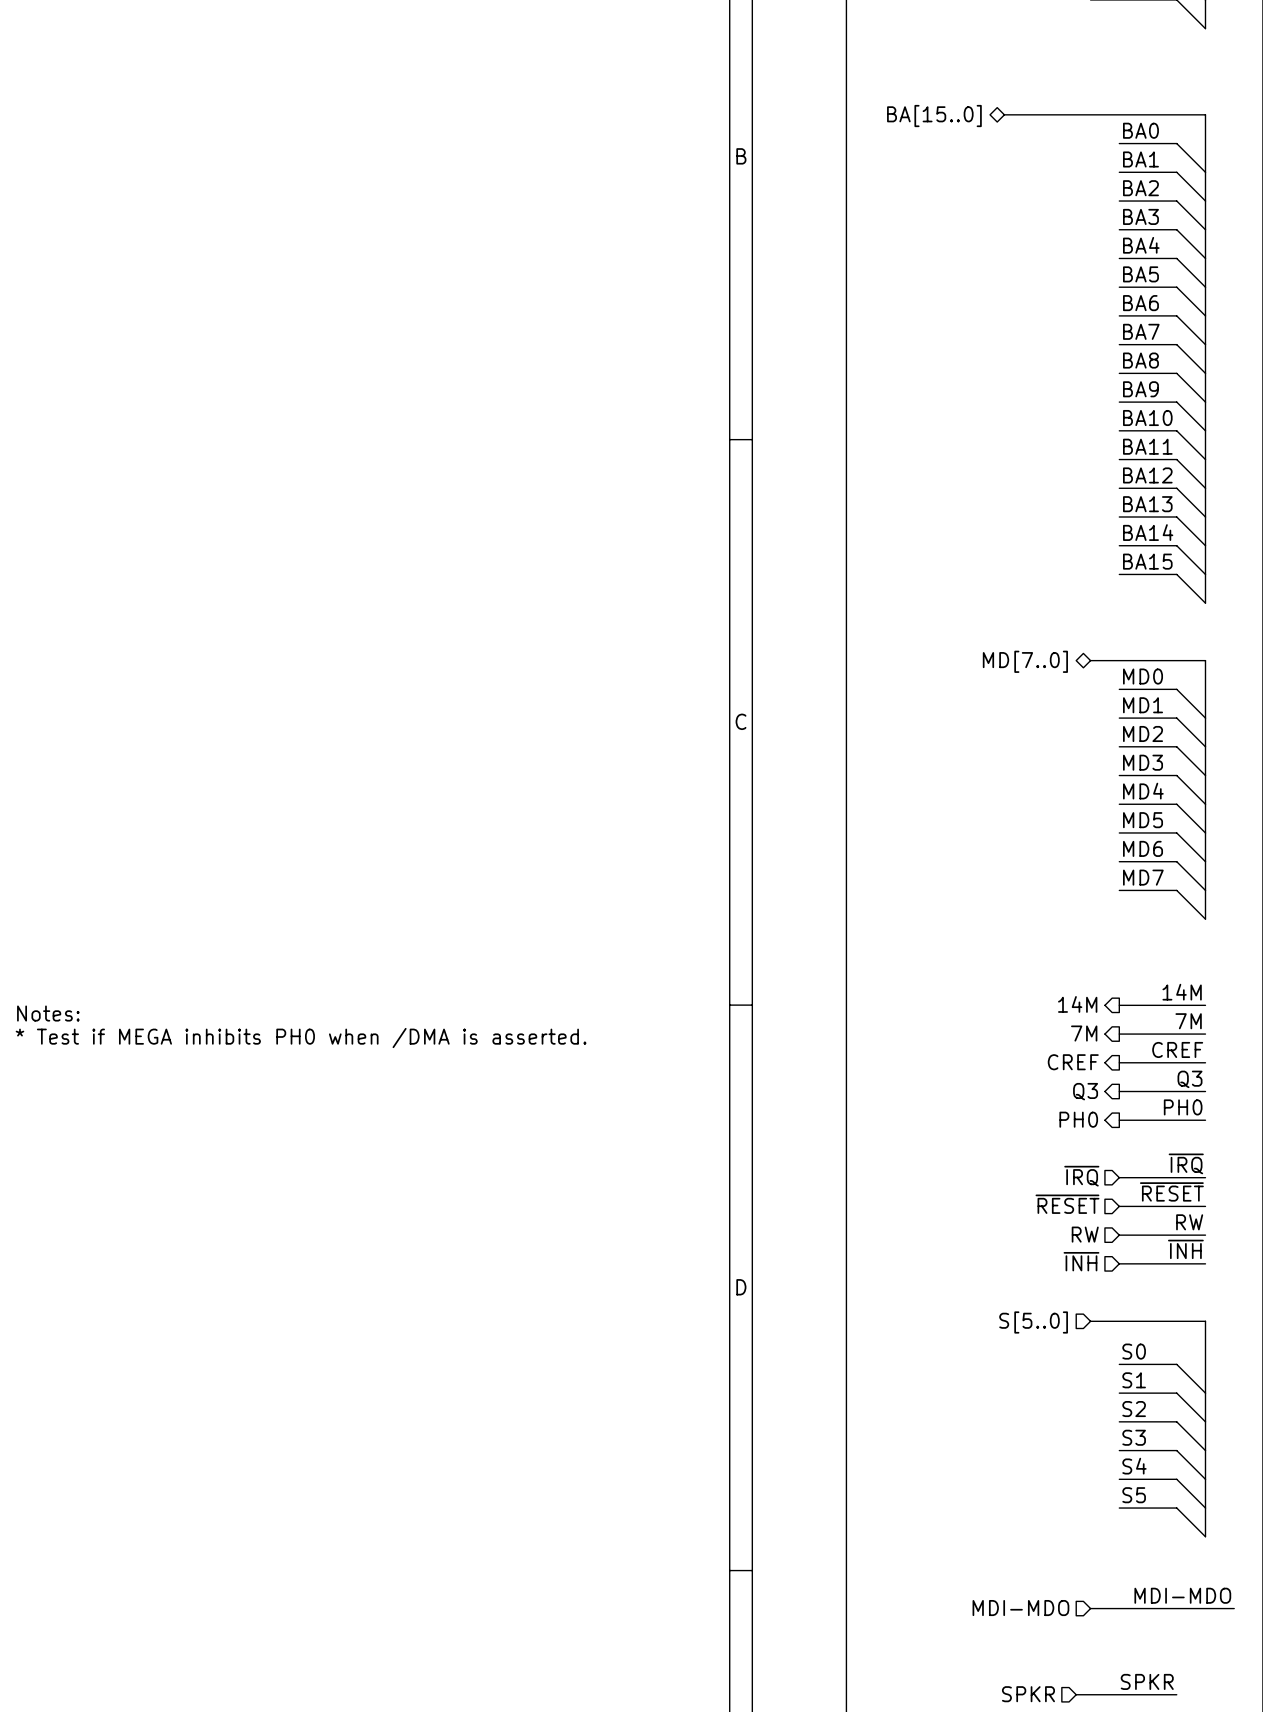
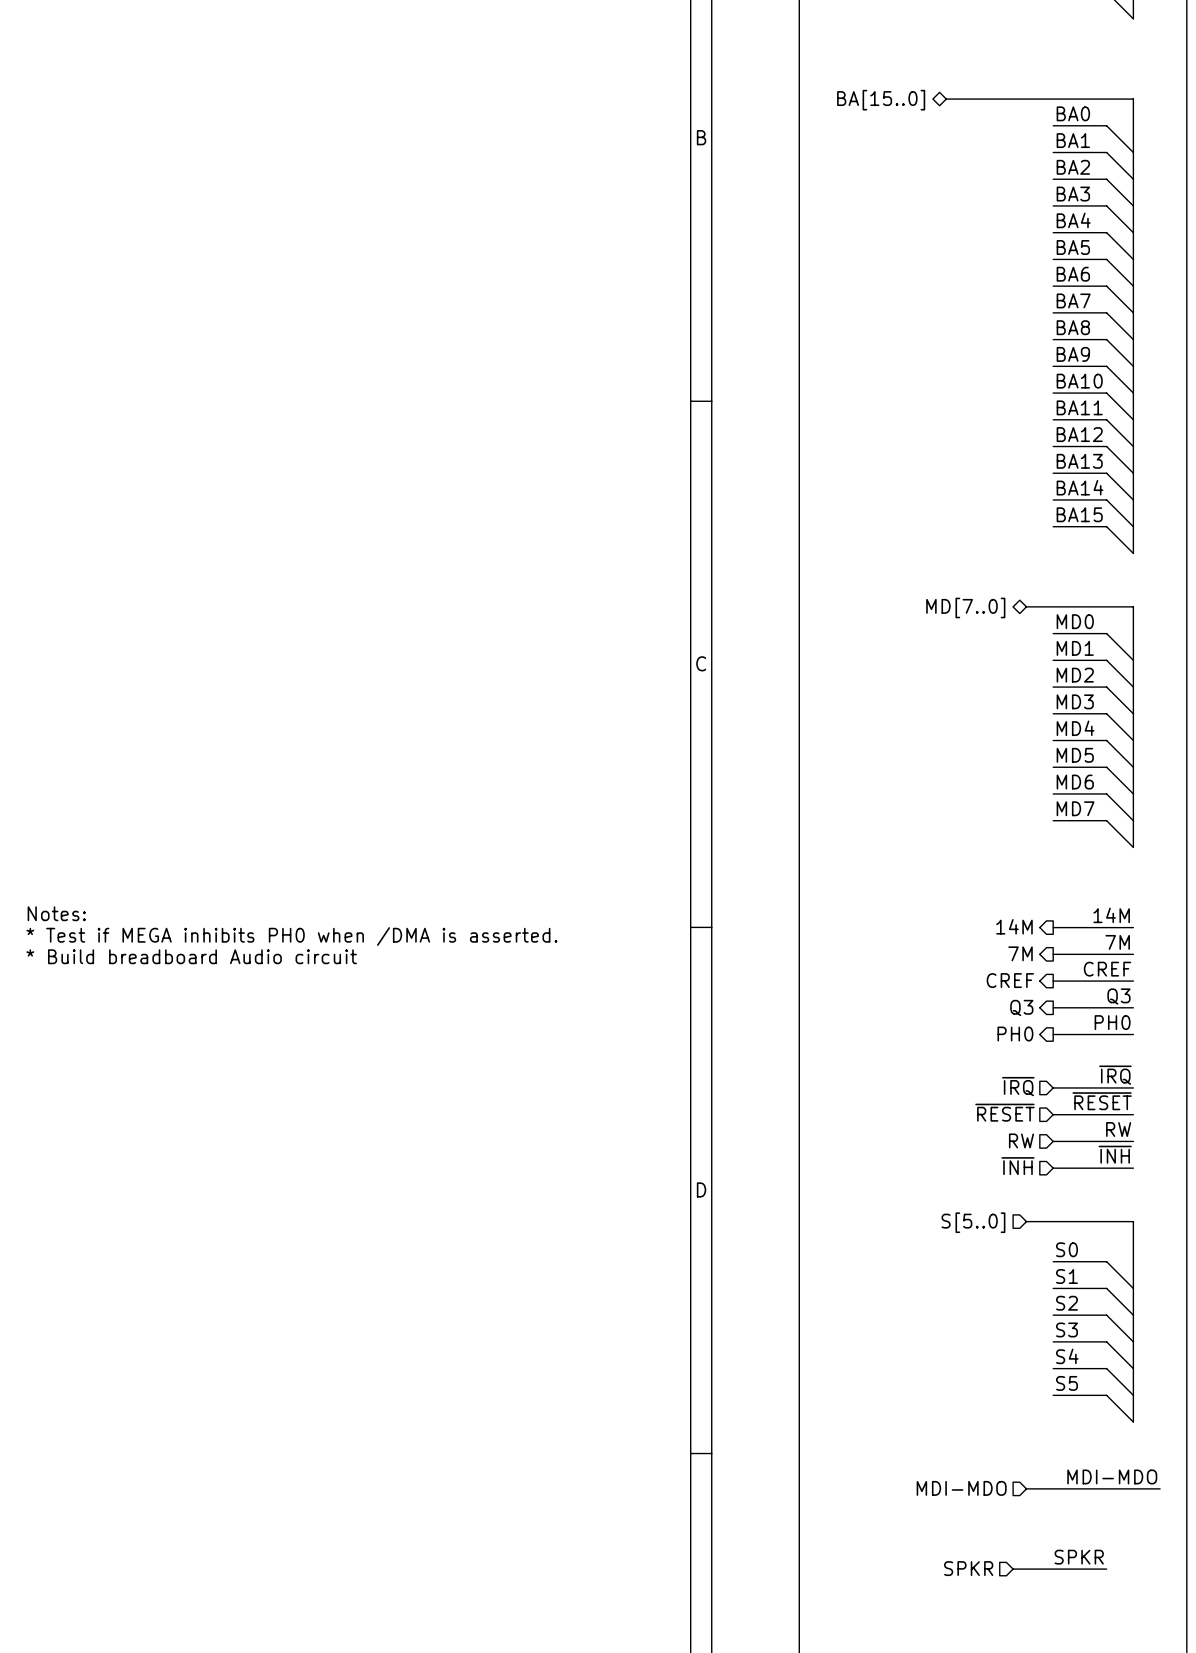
text: none -> Notes: (56, 913)
text: Notes: (48, 1013) -> * Test if MEGA inhibits PH0 when /DMA is asserted. (291, 936)
text: * Test if MEGA inhibits PH0 when /DMA is asserted. (301, 1038) -> * Build breadboard Audio circuit (191, 956)

